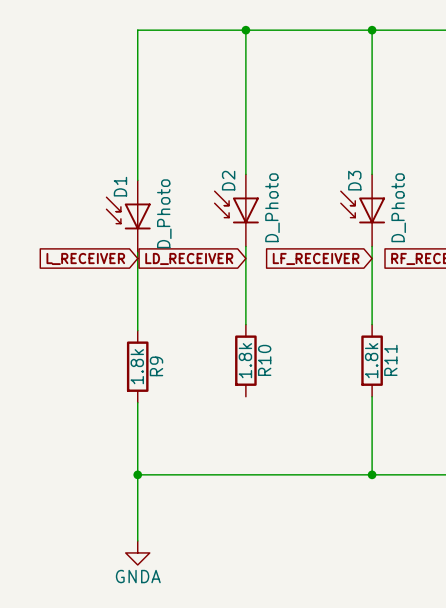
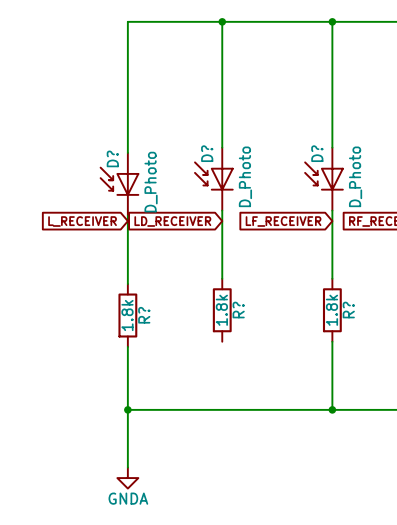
D2 name: D2 (228, 180) -> D? (207, 153)
D3 name: D3 (354, 180) -> D? (317, 153)
D1 name: D1 (120, 186) -> D? (112, 158)
R10 name: R10 (264, 360) -> R? (238, 310)
R11 name: R11 (390, 360) -> R? (348, 310)
R9 name: R9 (156, 366) -> R? (144, 315)

